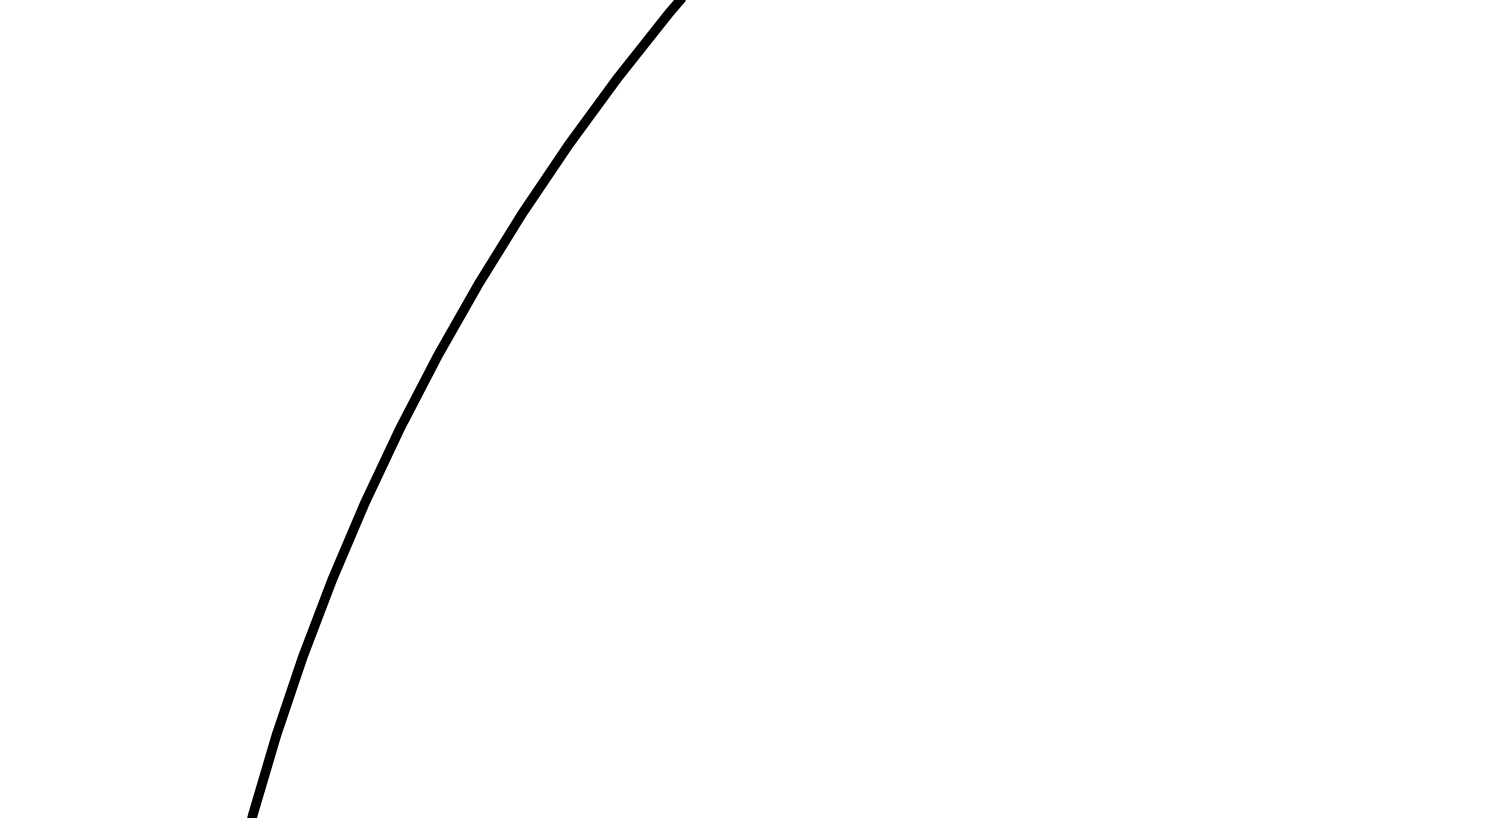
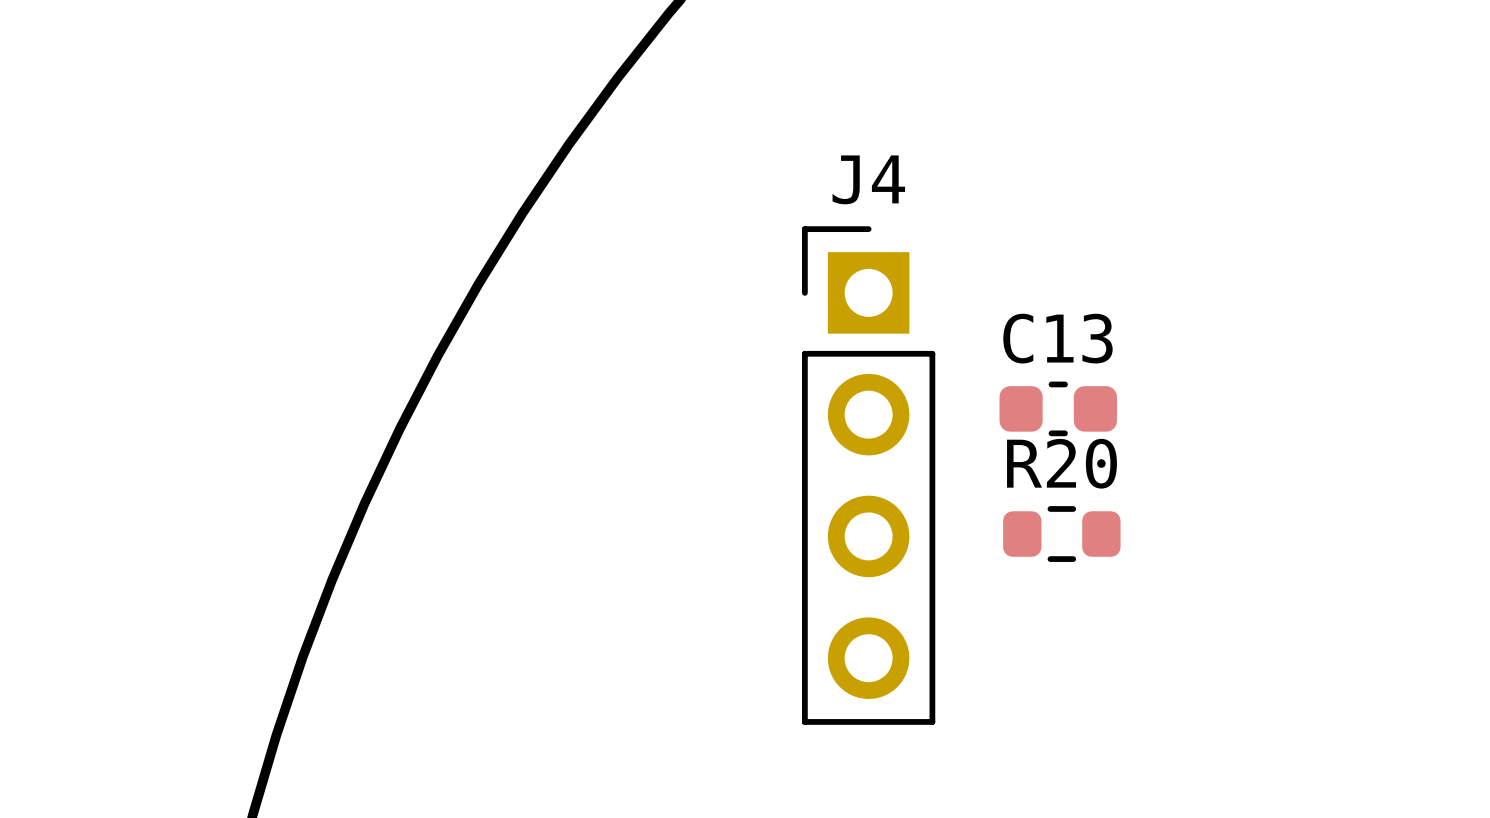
C13: none -> (1058, 408)
J4: none -> (868, 475)
R20: none -> (1061, 534)

